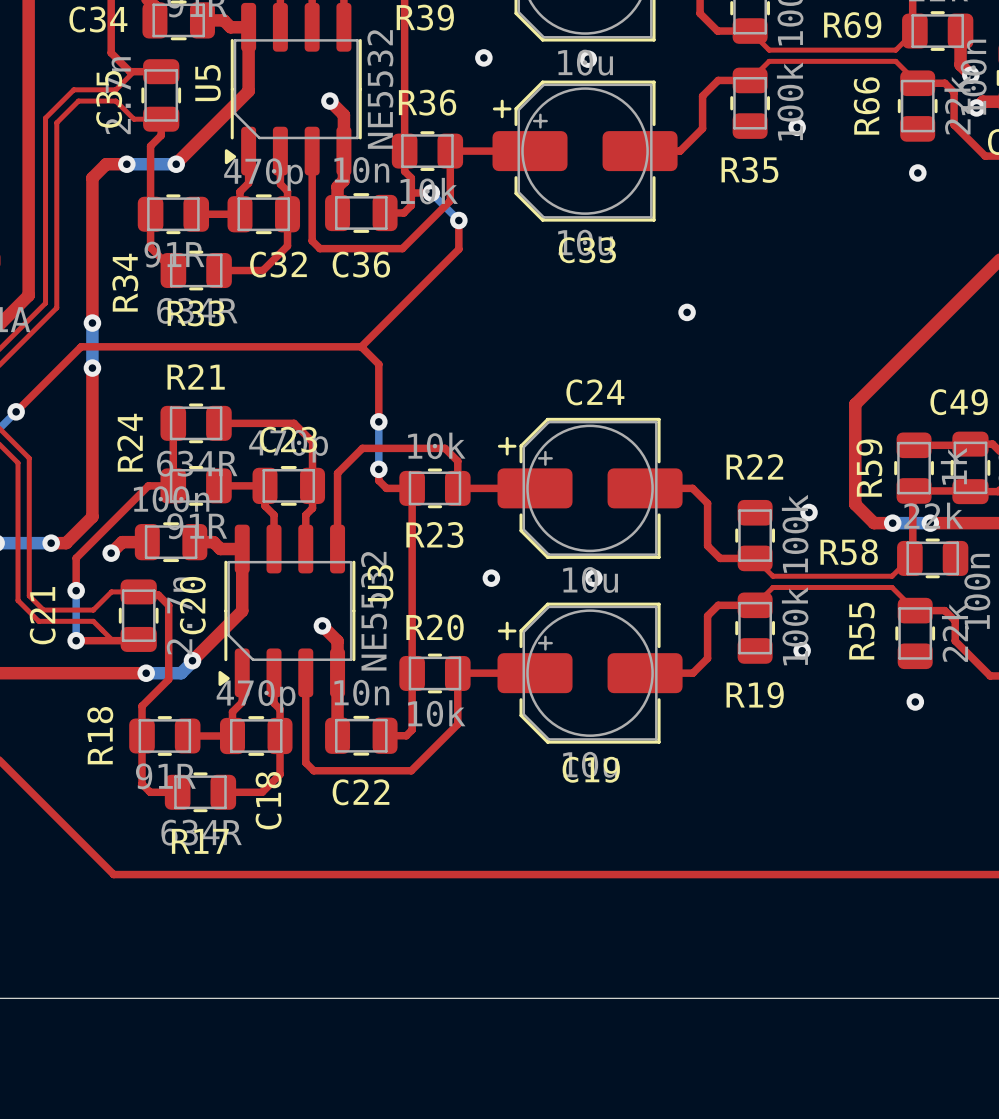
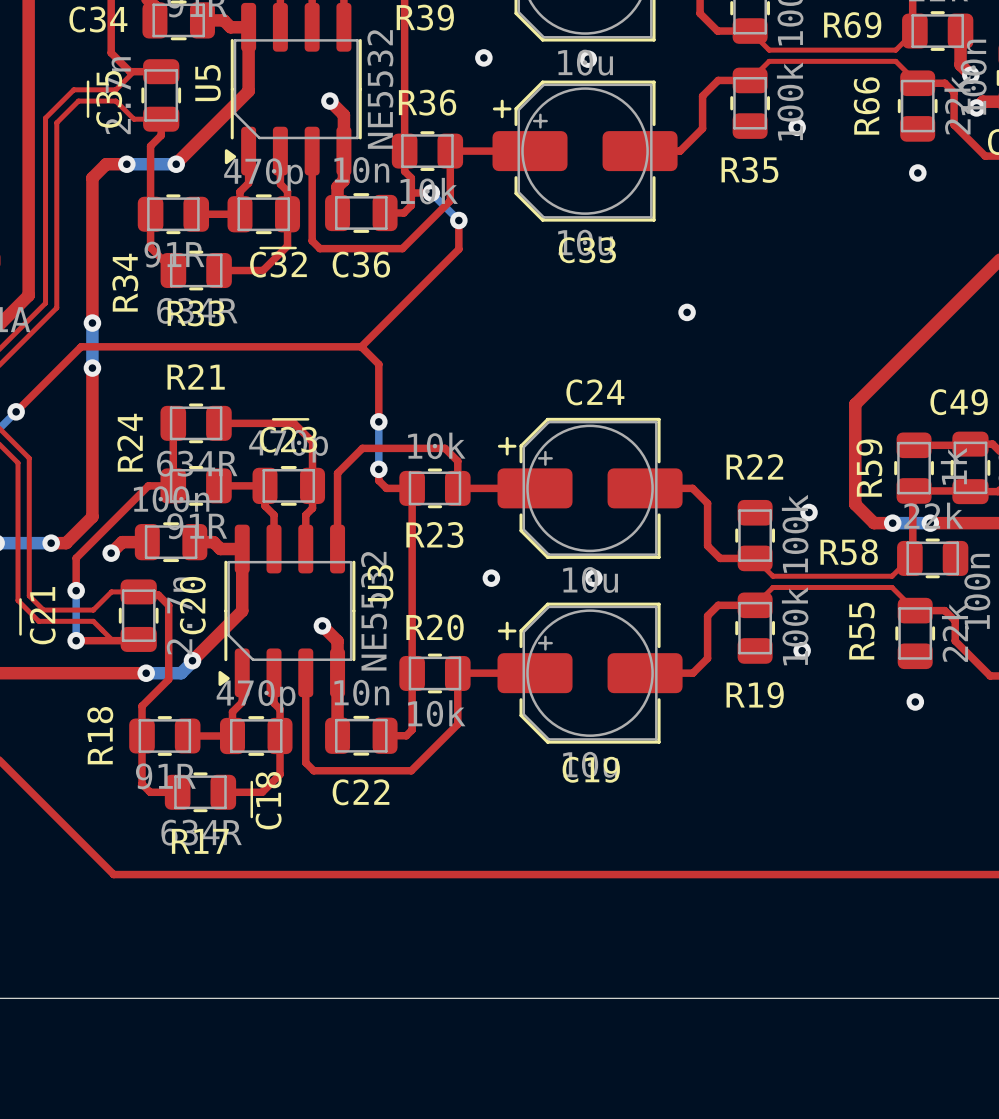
line: none -> (88, 81) (88, 116)
line: none -> (260, 248) (295, 248)
line: none -> (273, 419) (308, 419)
line: none -> (20, 599) (20, 634)
line: none -> (251, 782) (251, 817)

